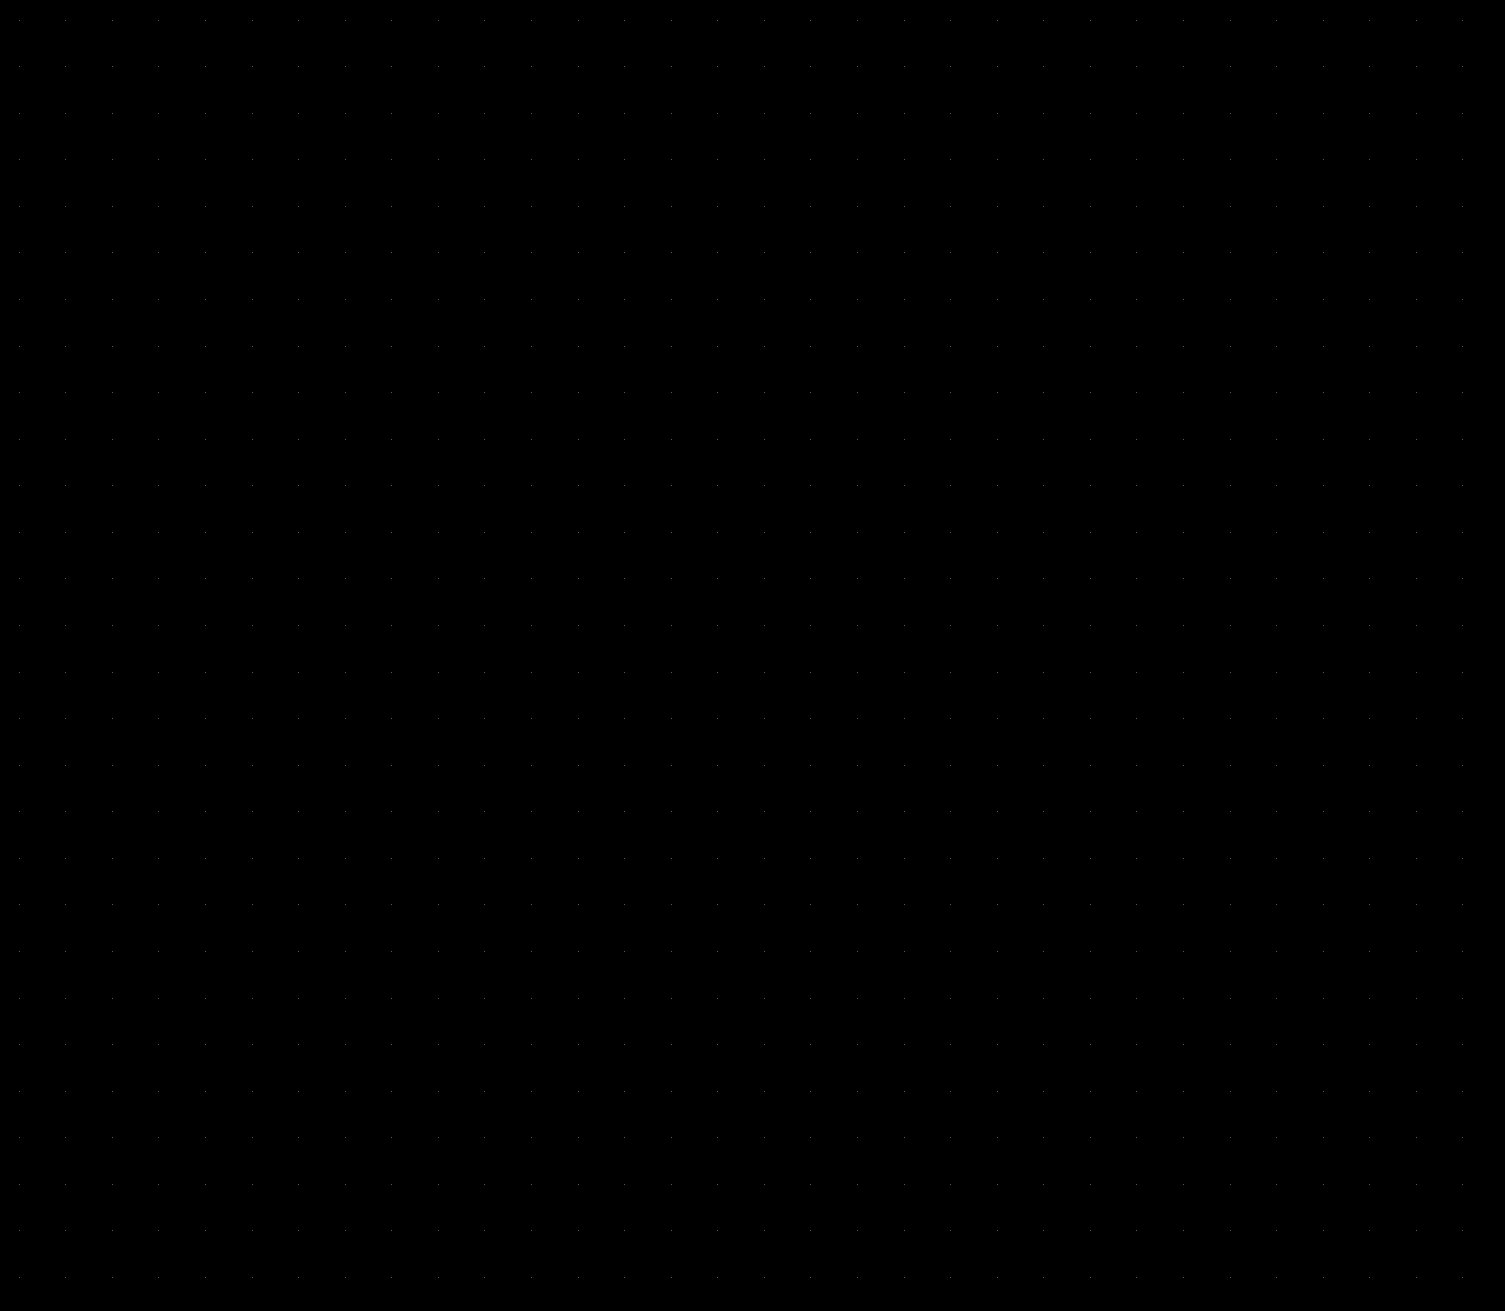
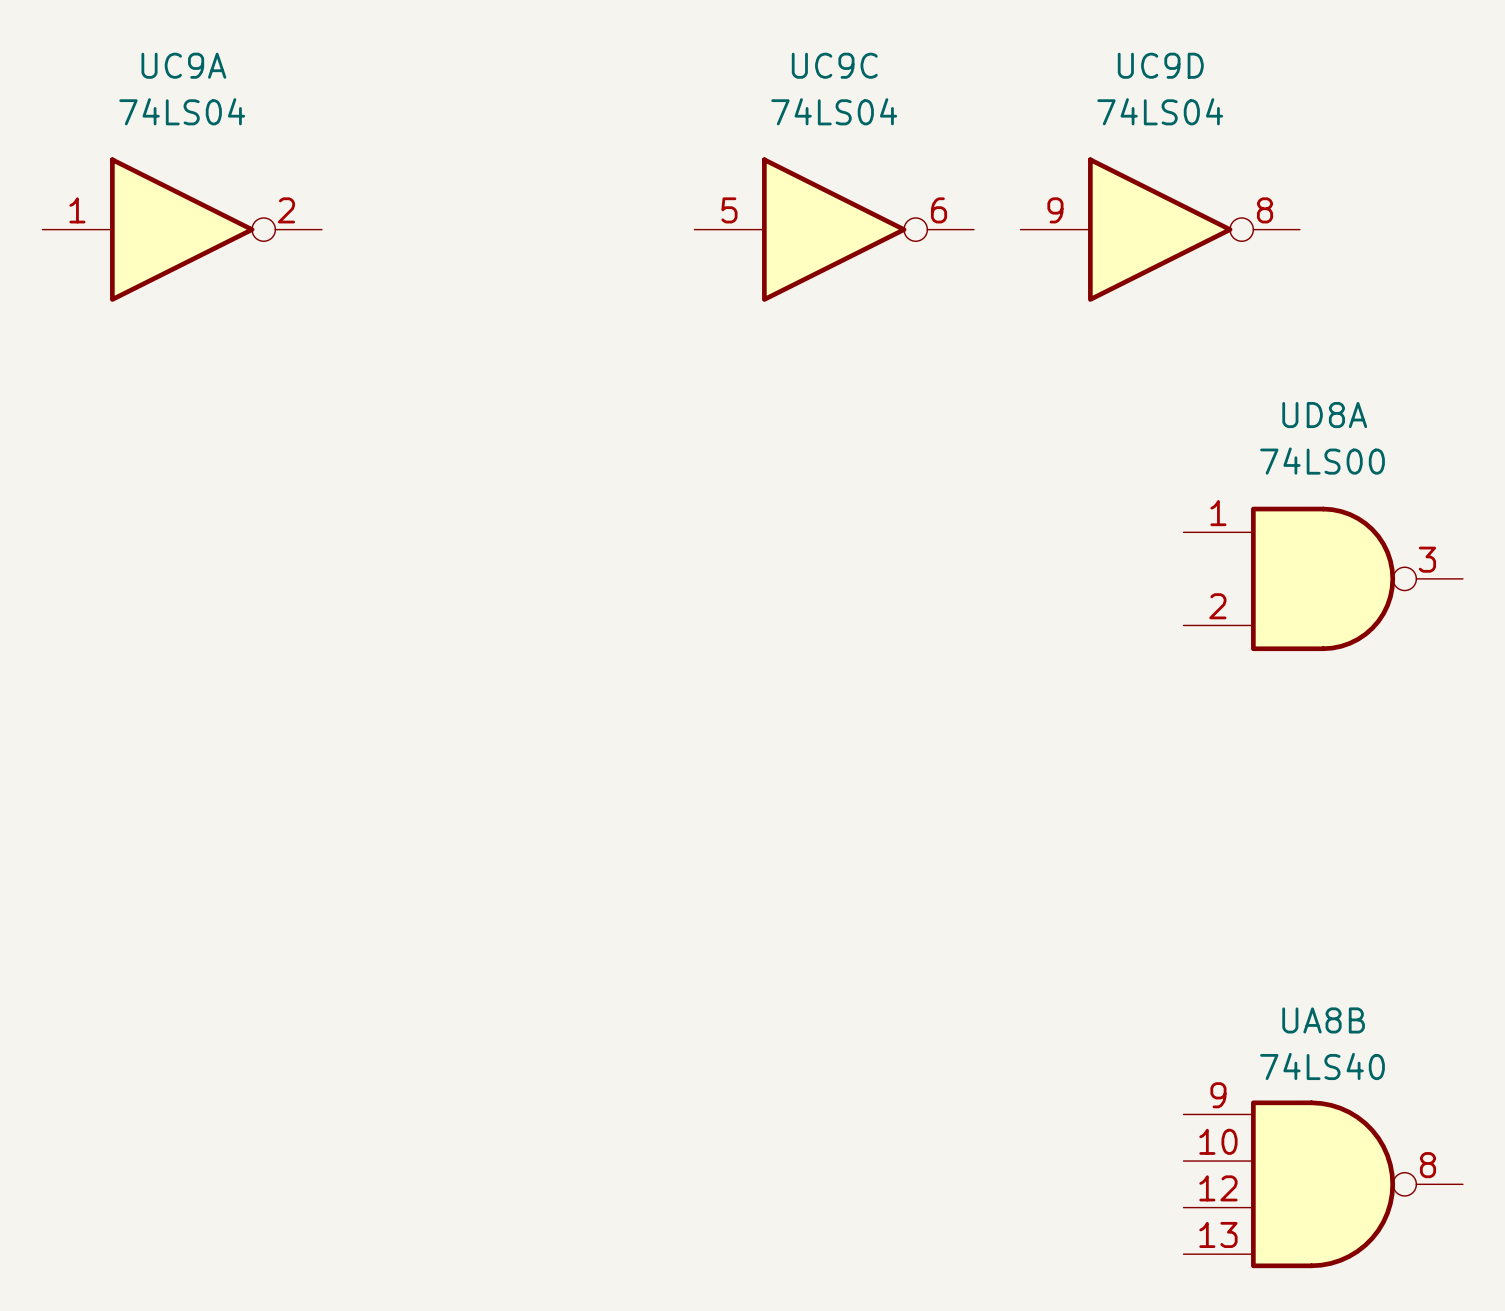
UC9A: none -> 74LS04 (182, 229)
UC9C: none -> 74LS04 (834, 229)
UC9D: none -> 74LS04 (1160, 229)
UD8A: none -> 74LS00 (1323, 578)
UA8B: none -> 74LS40 (1323, 1184)

